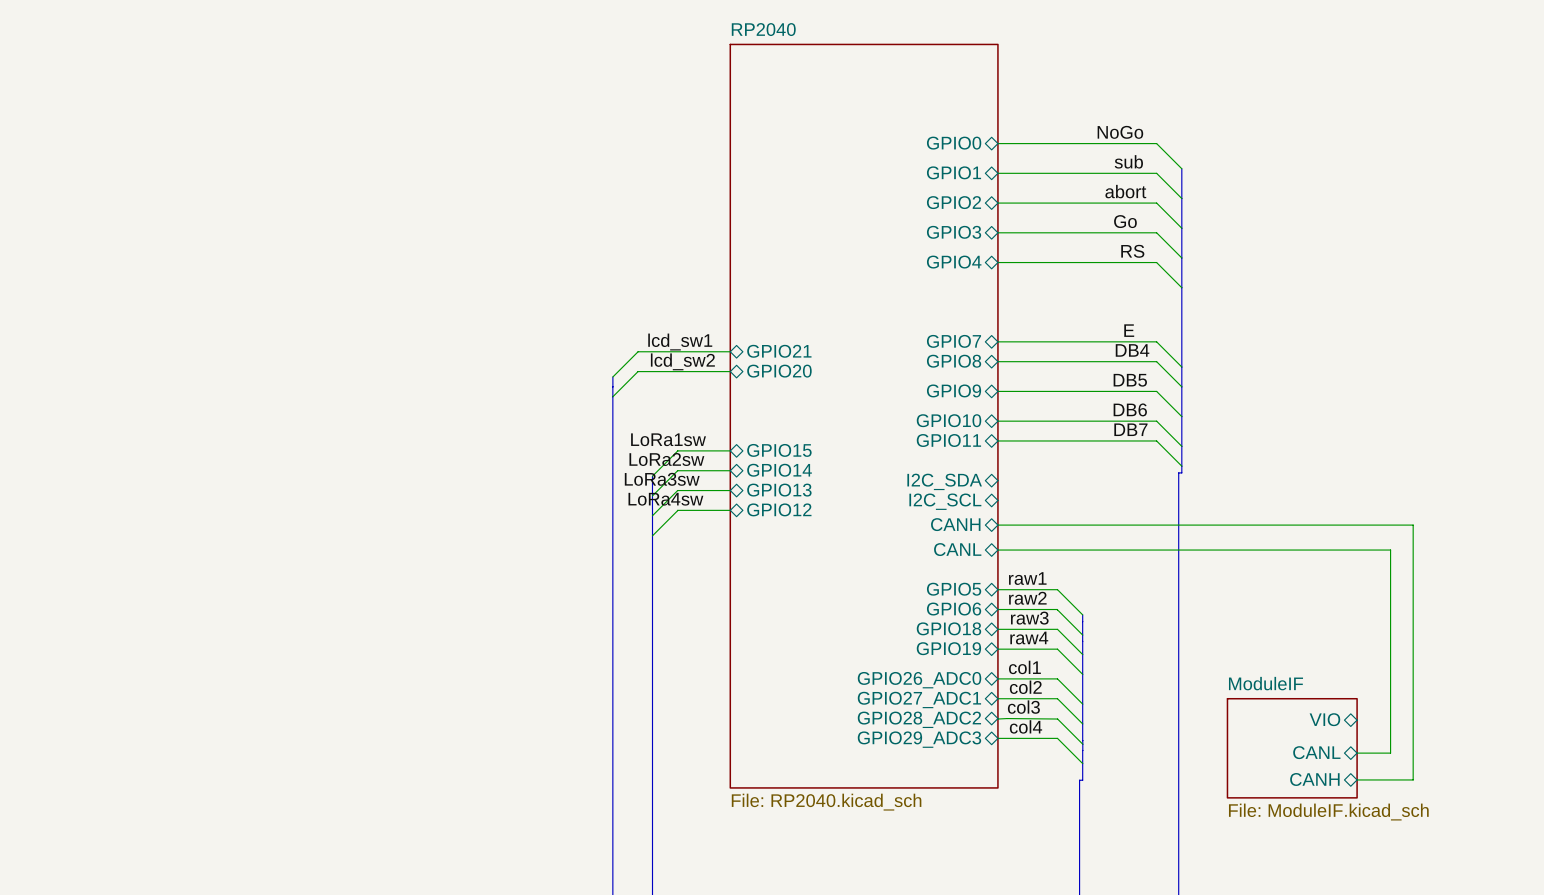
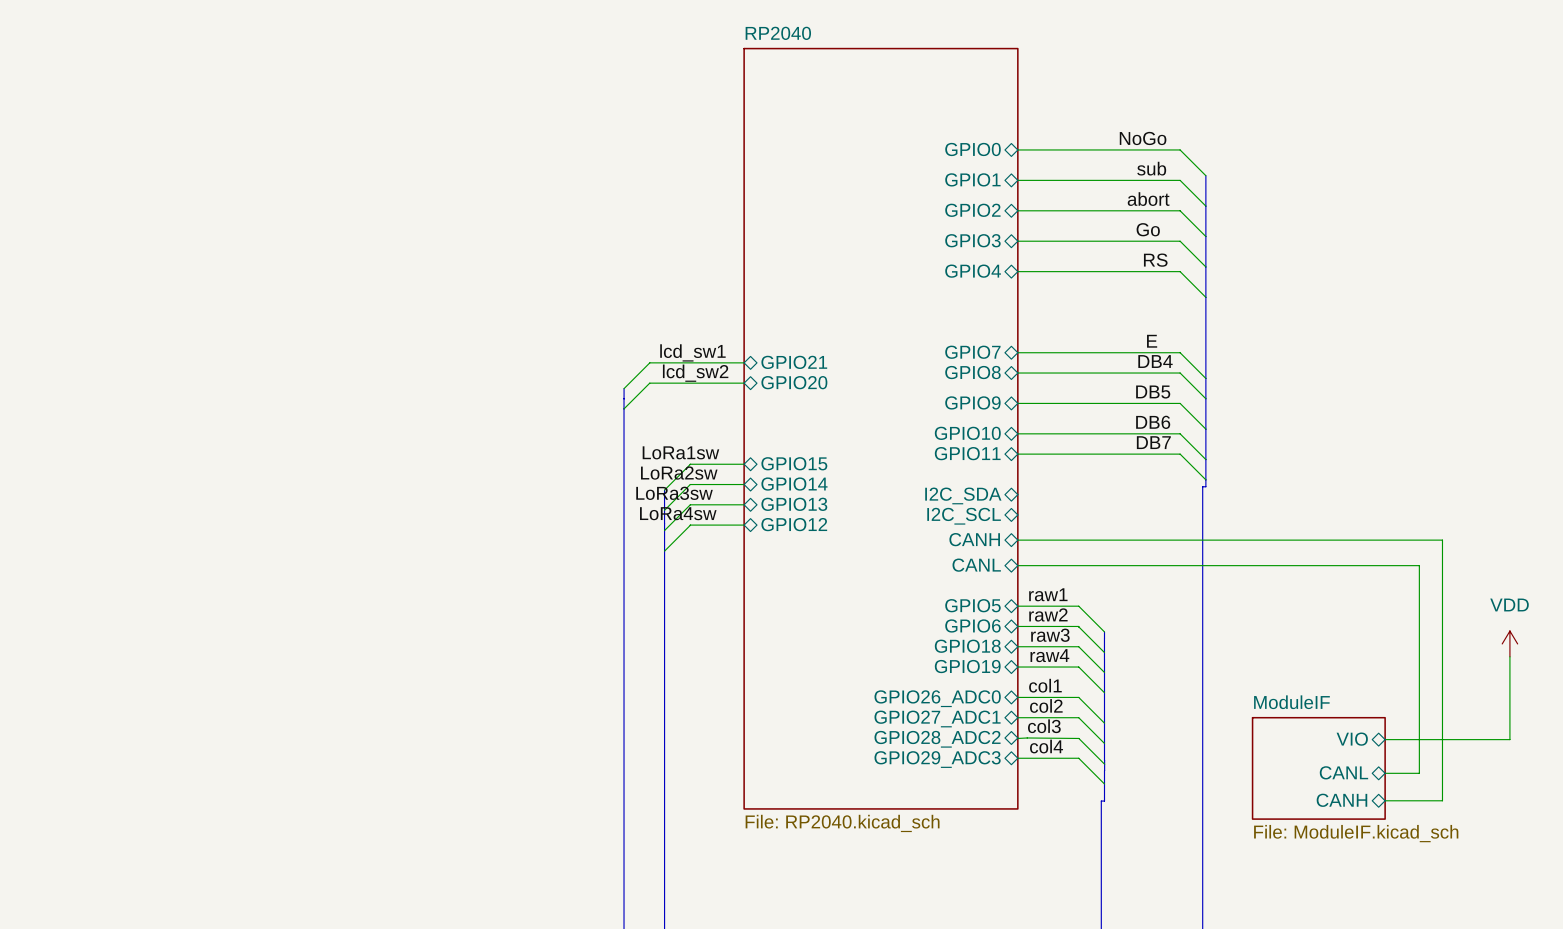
power symbol: none -> VDD (1509, 643)
wire: none -> (1509, 656) (1509, 739) (1385, 739)

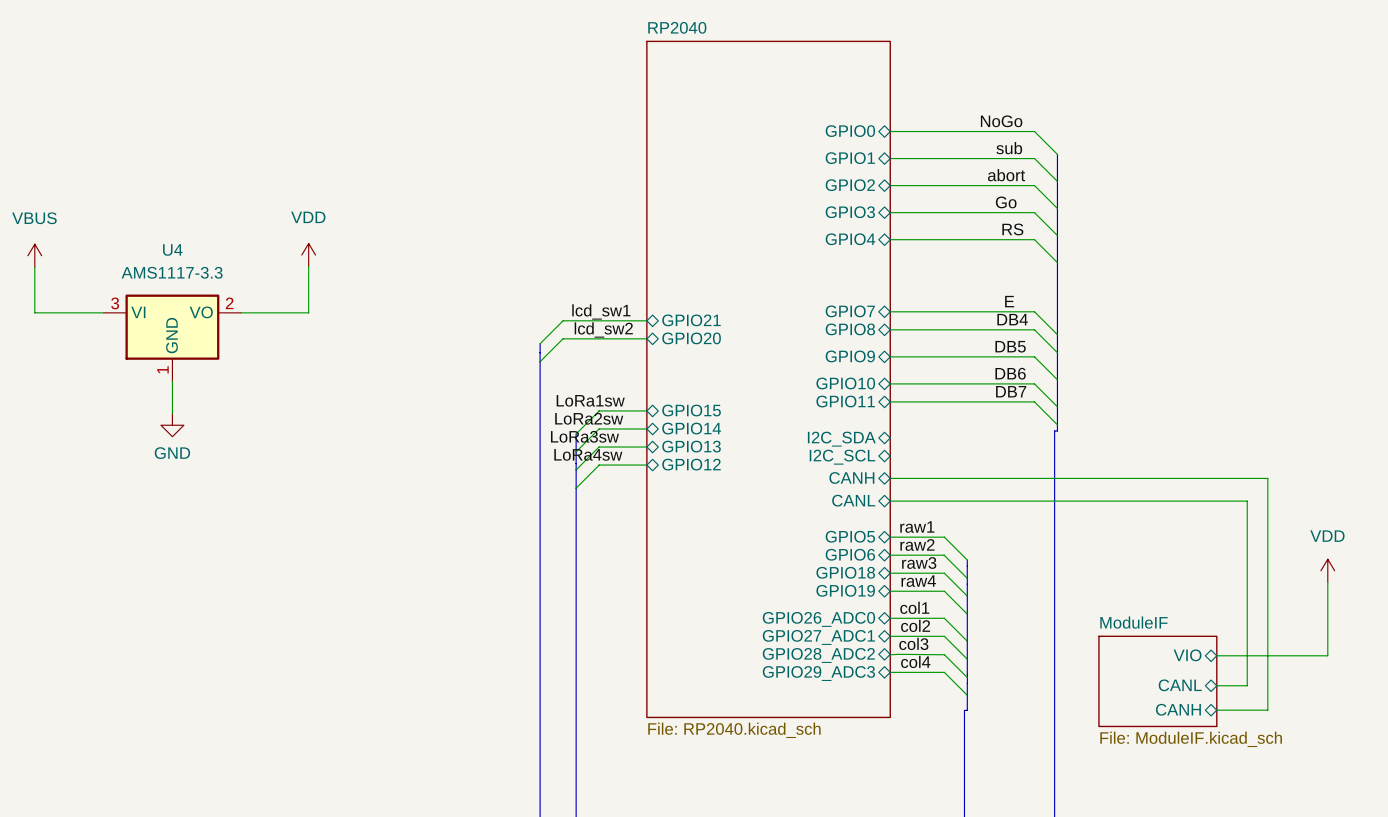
power symbol: none -> VDD (308, 255)
power symbol: none -> VBUS (34, 255)
wire: none -> (308, 266) (308, 312) (241, 312)
wire: none -> (34, 267) (34, 312) (103, 312)
U4: none -> AMS1117-3.3 (172, 338)
wire: none -> (172, 381) (172, 413)
power symbol: none -> GND (172, 425)

